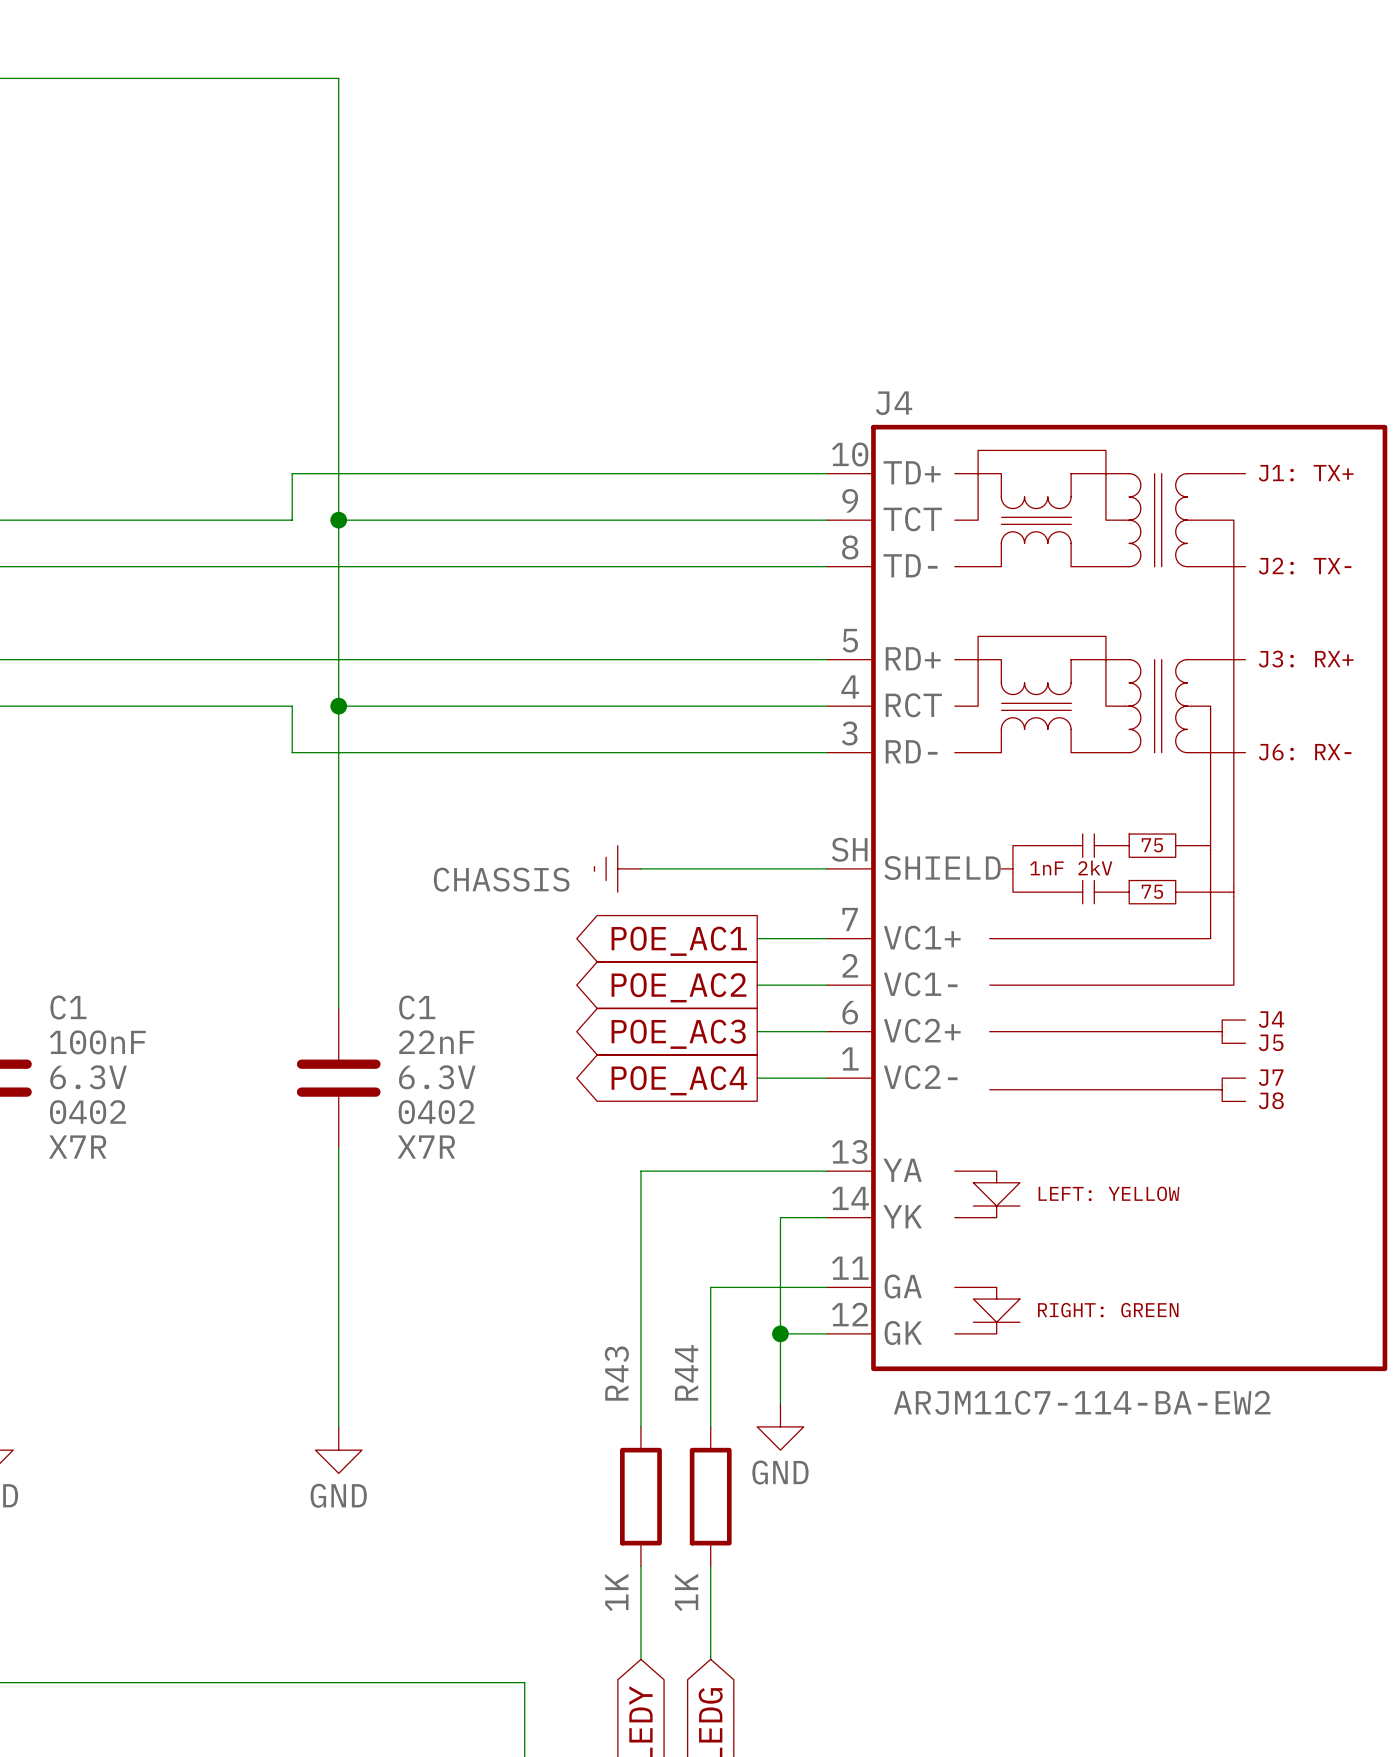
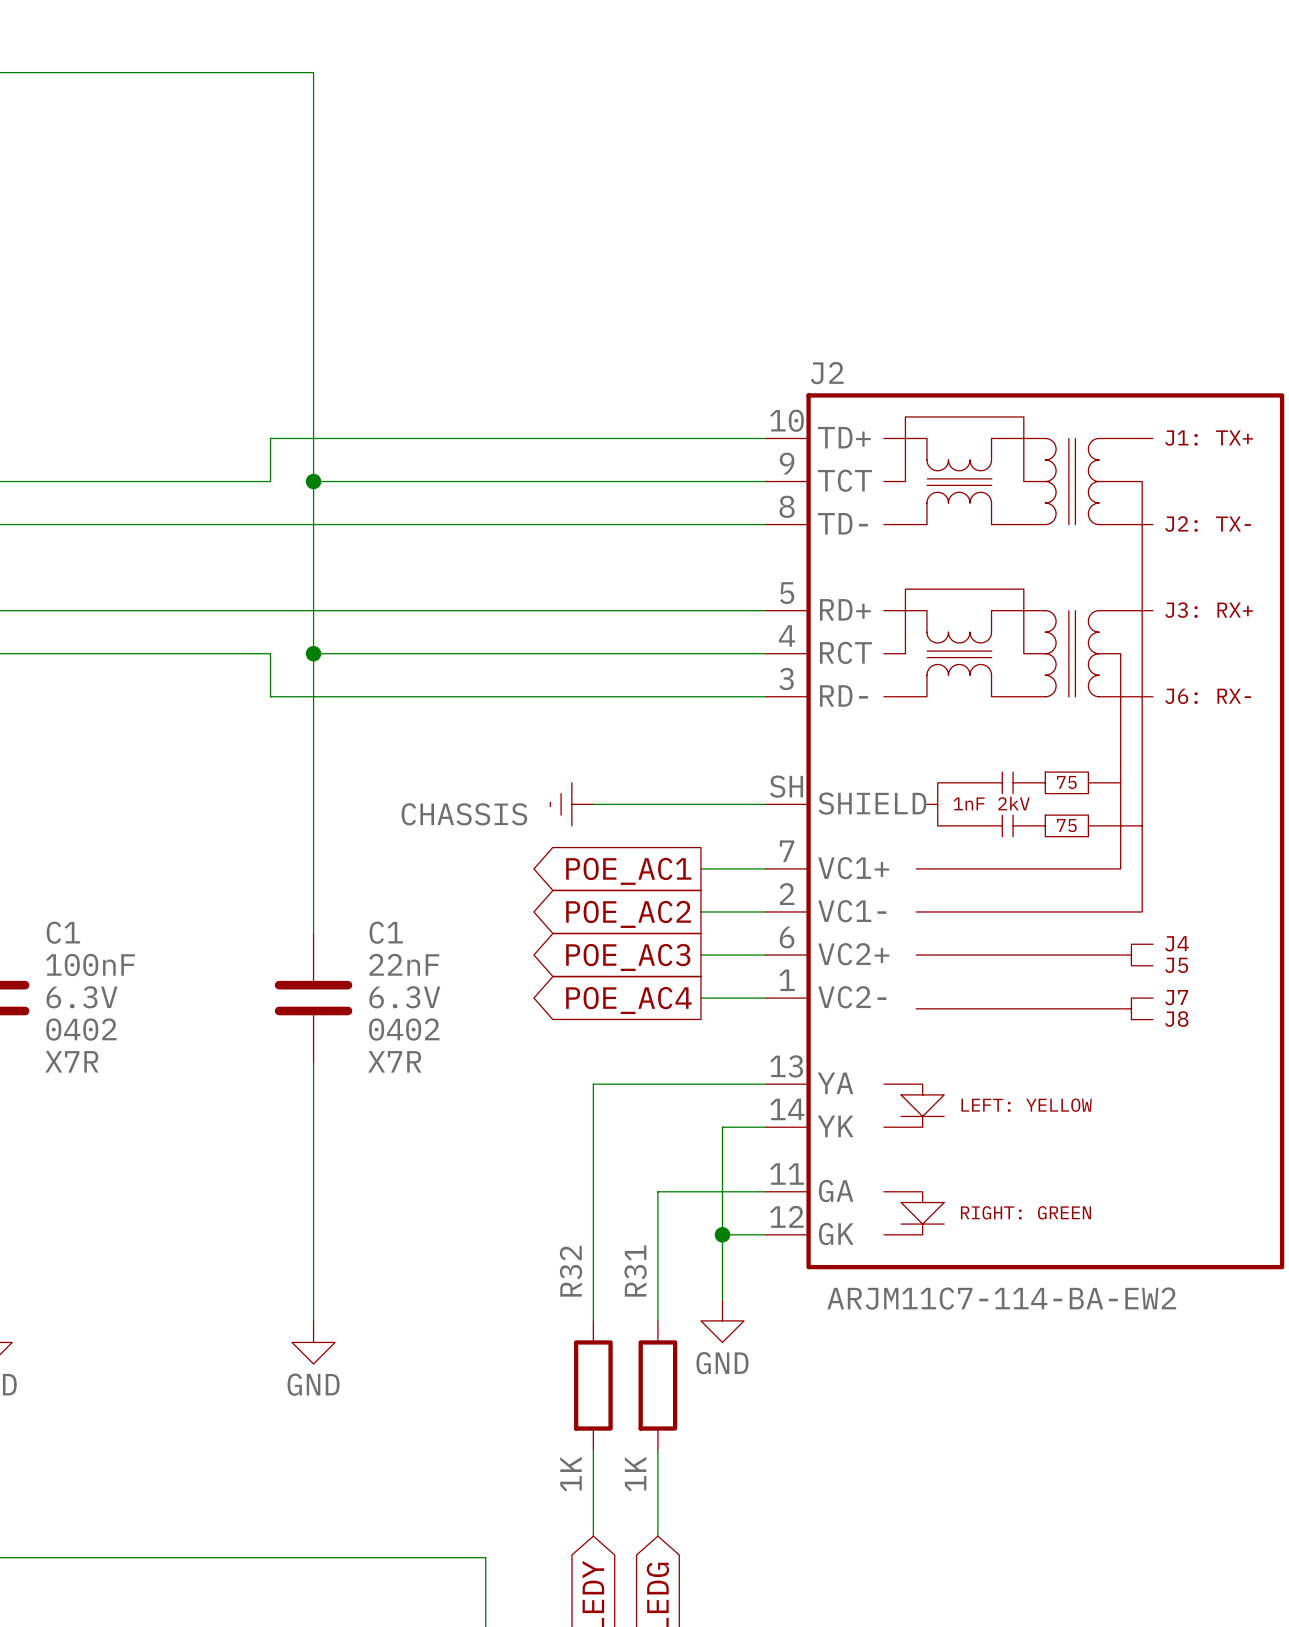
J4 name: J4 (894, 403) -> J2 (827, 373)
R44 name: R44 (686, 1372) -> R31 (635, 1270)
R43 name: R43 (616, 1373) -> R32 (571, 1271)

